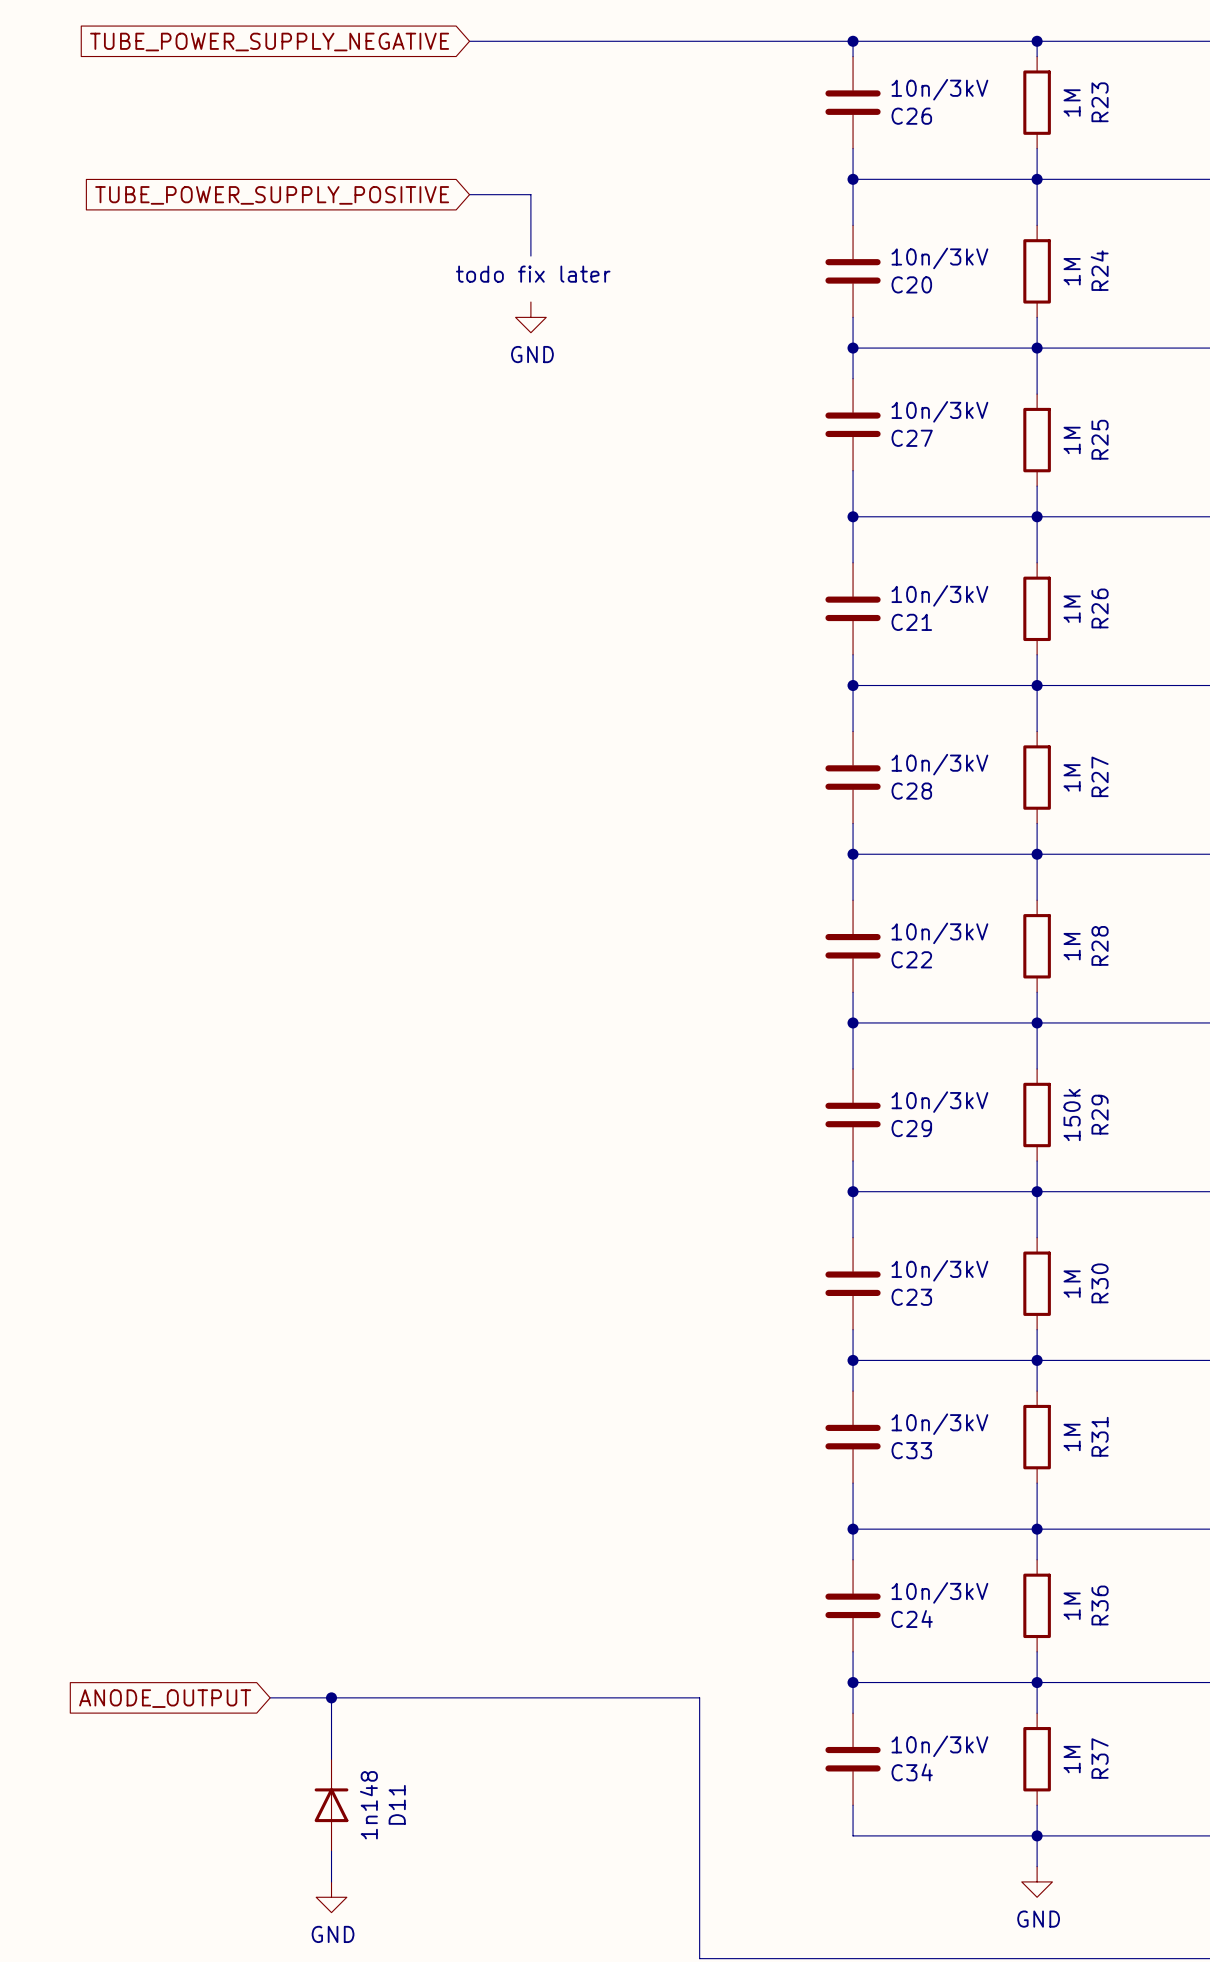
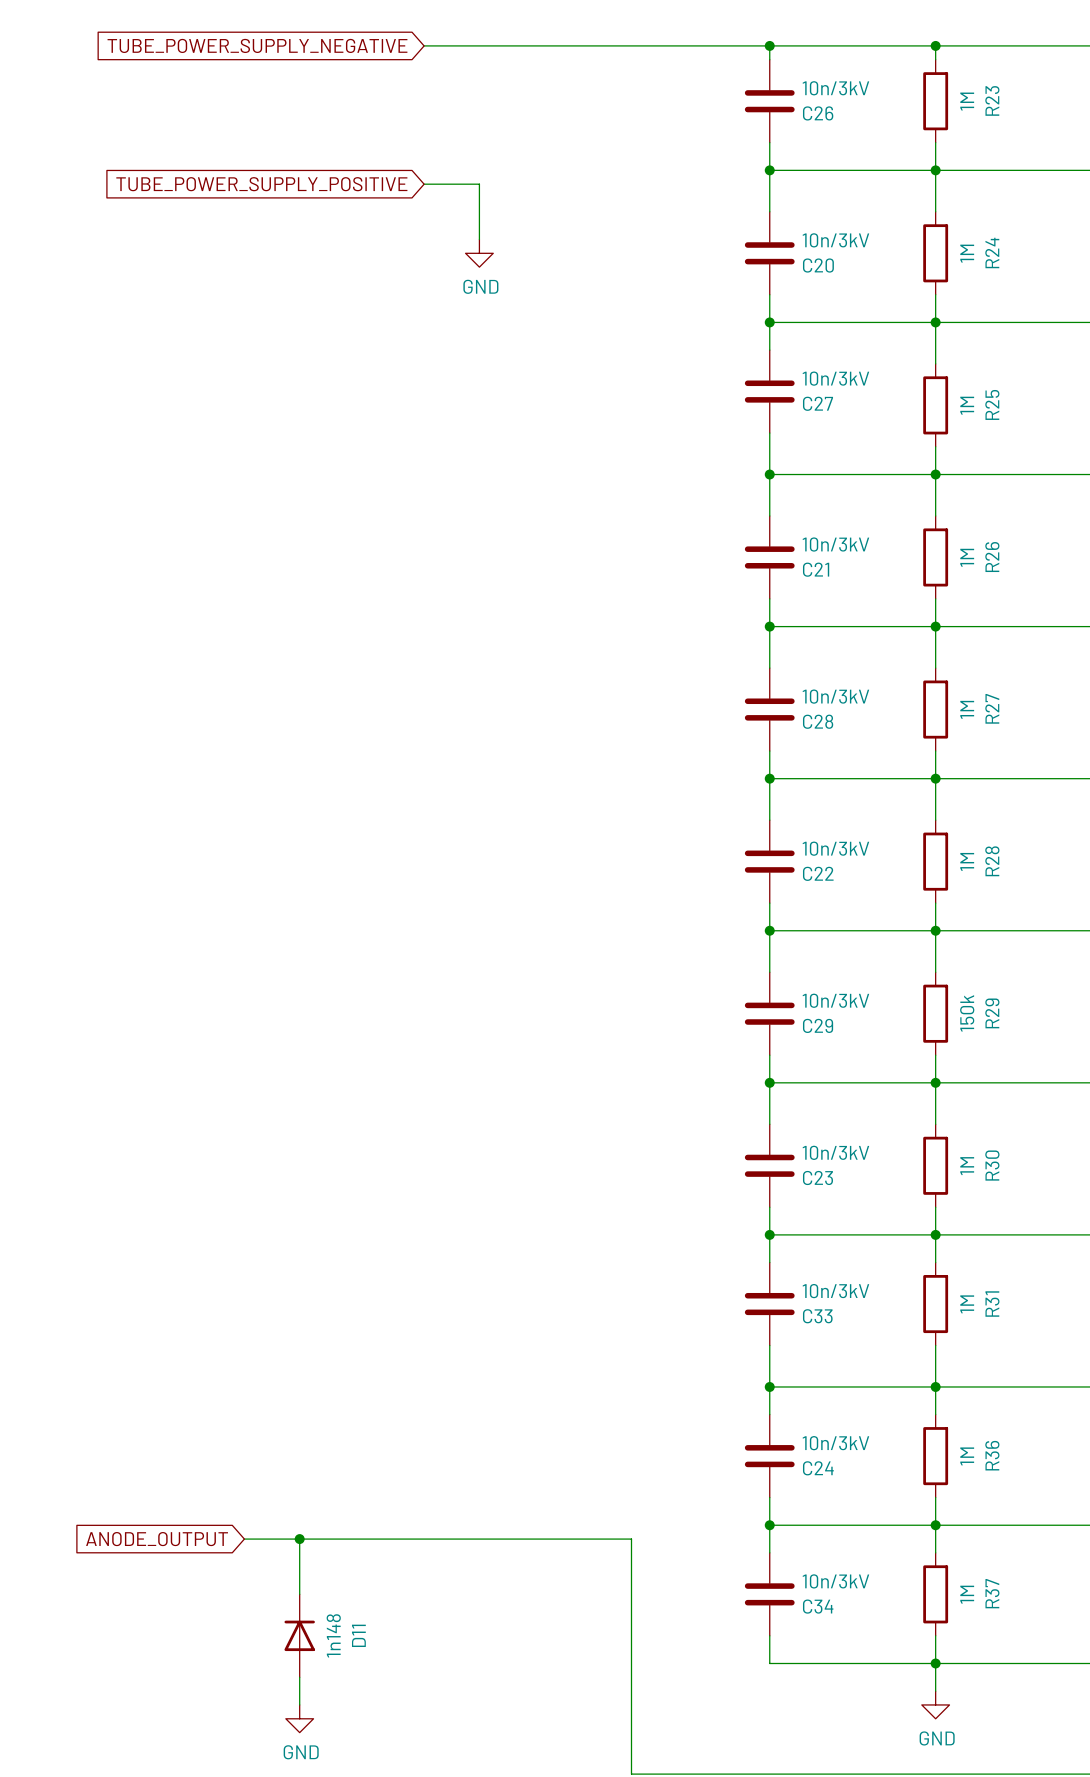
text: todo fix later (533, 274) -> none
power symbol position: GND (530, 317) -> GND (479, 253)

